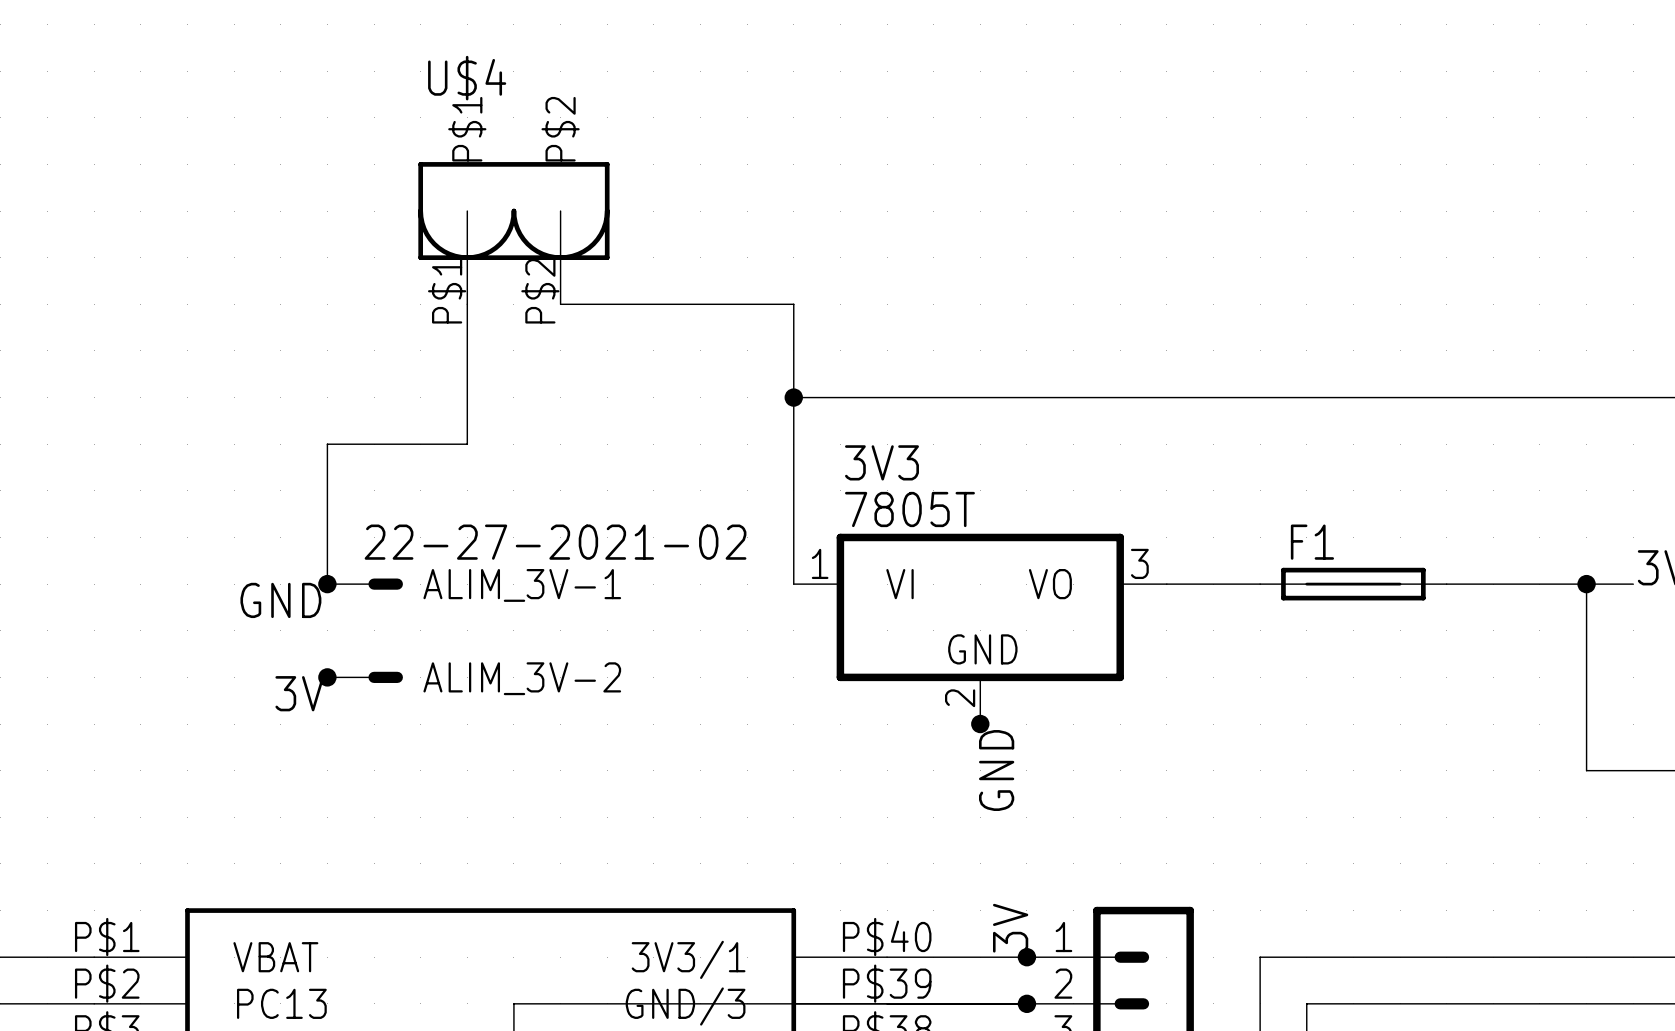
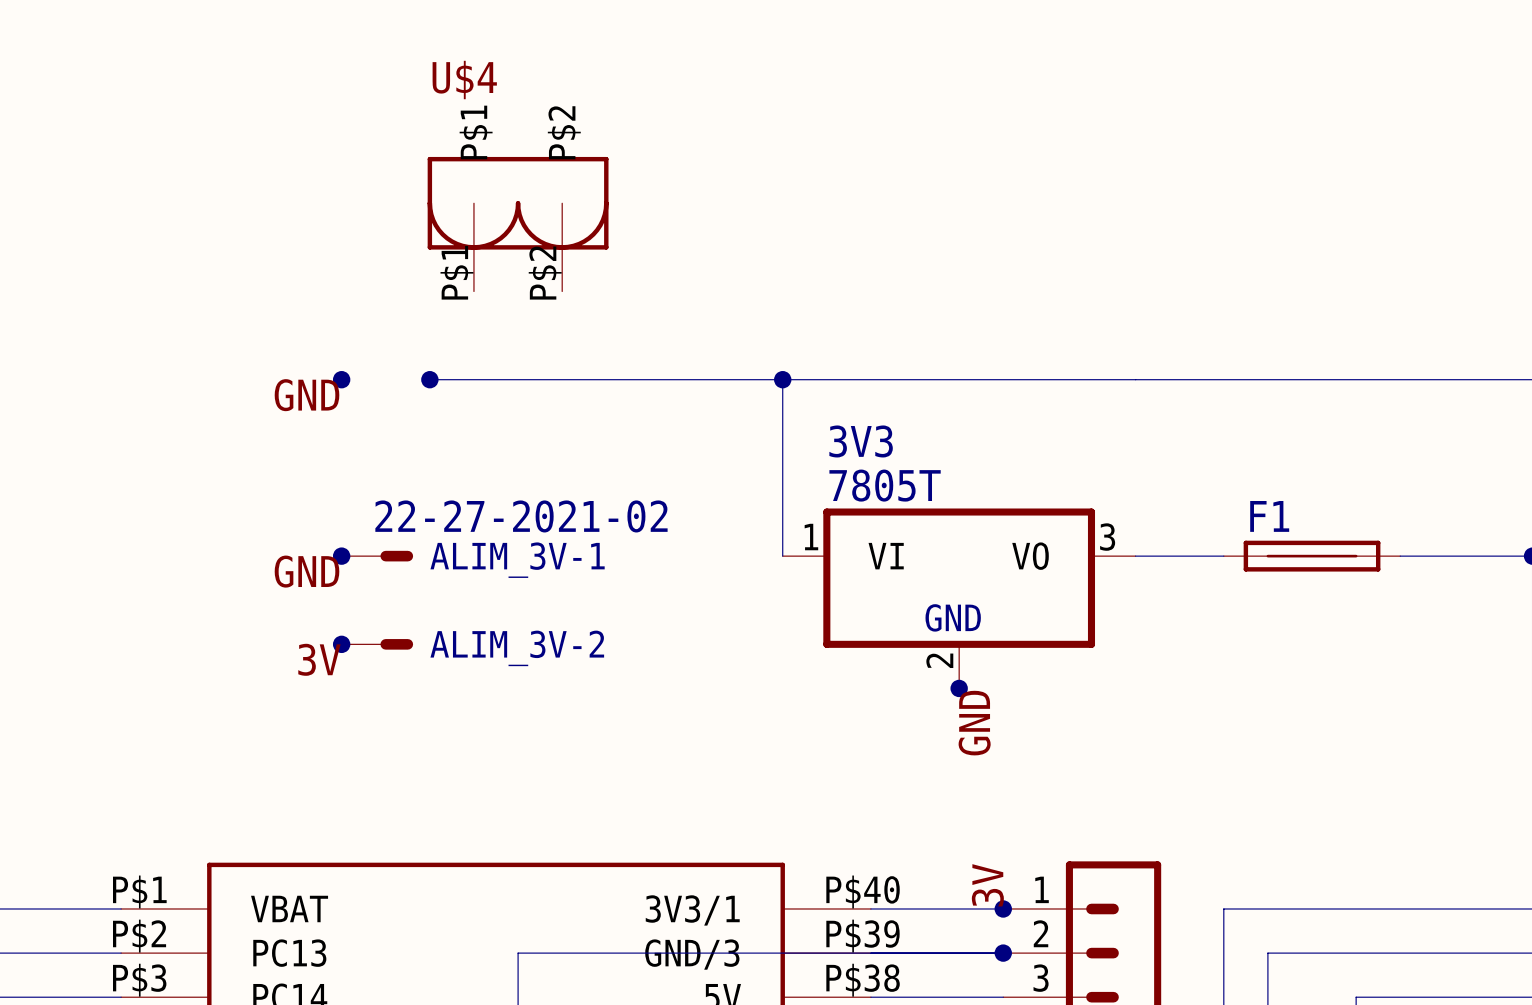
wire: (467, 304) (467, 444) (327, 444) (327, 584) -> none
wire: (560, 304) (793, 304) (793, 397) -> (429, 379) (782, 379)
junction: none -> (341, 379)
junction: none -> (429, 379)
label: none -> GND (306, 395)

